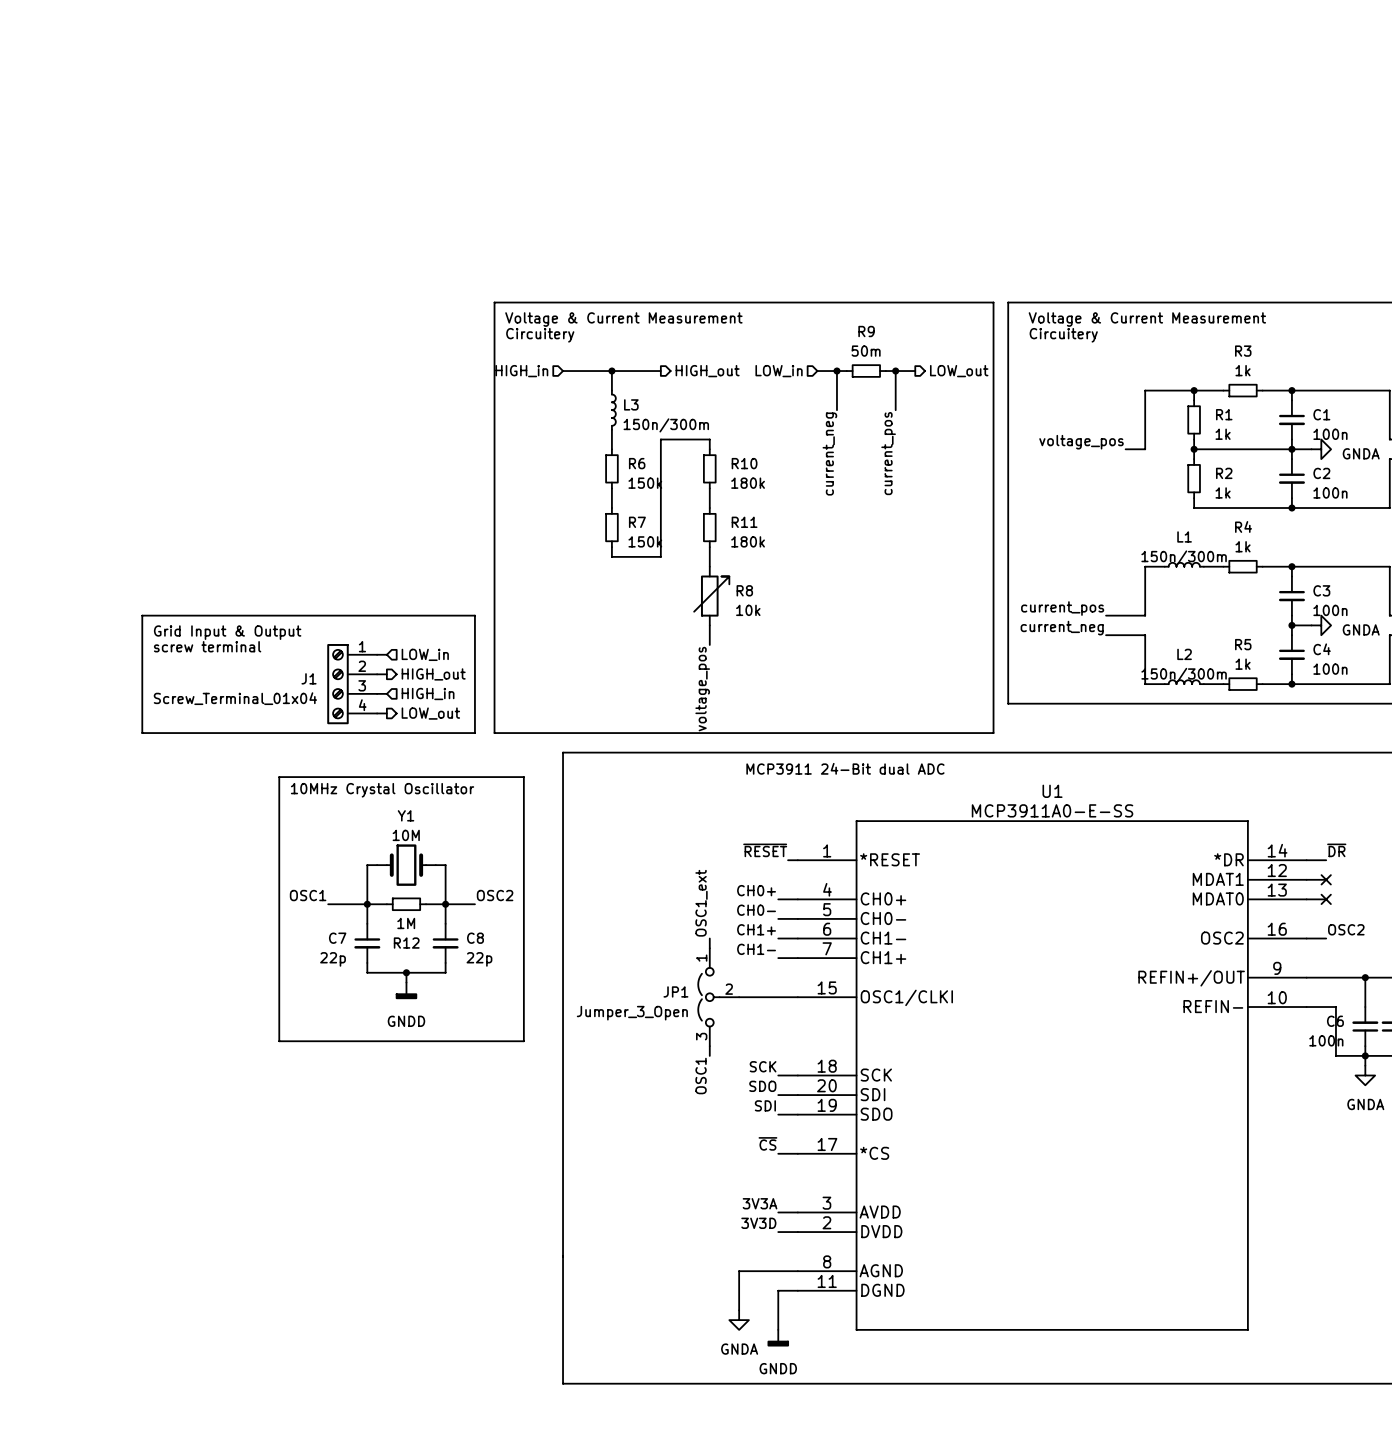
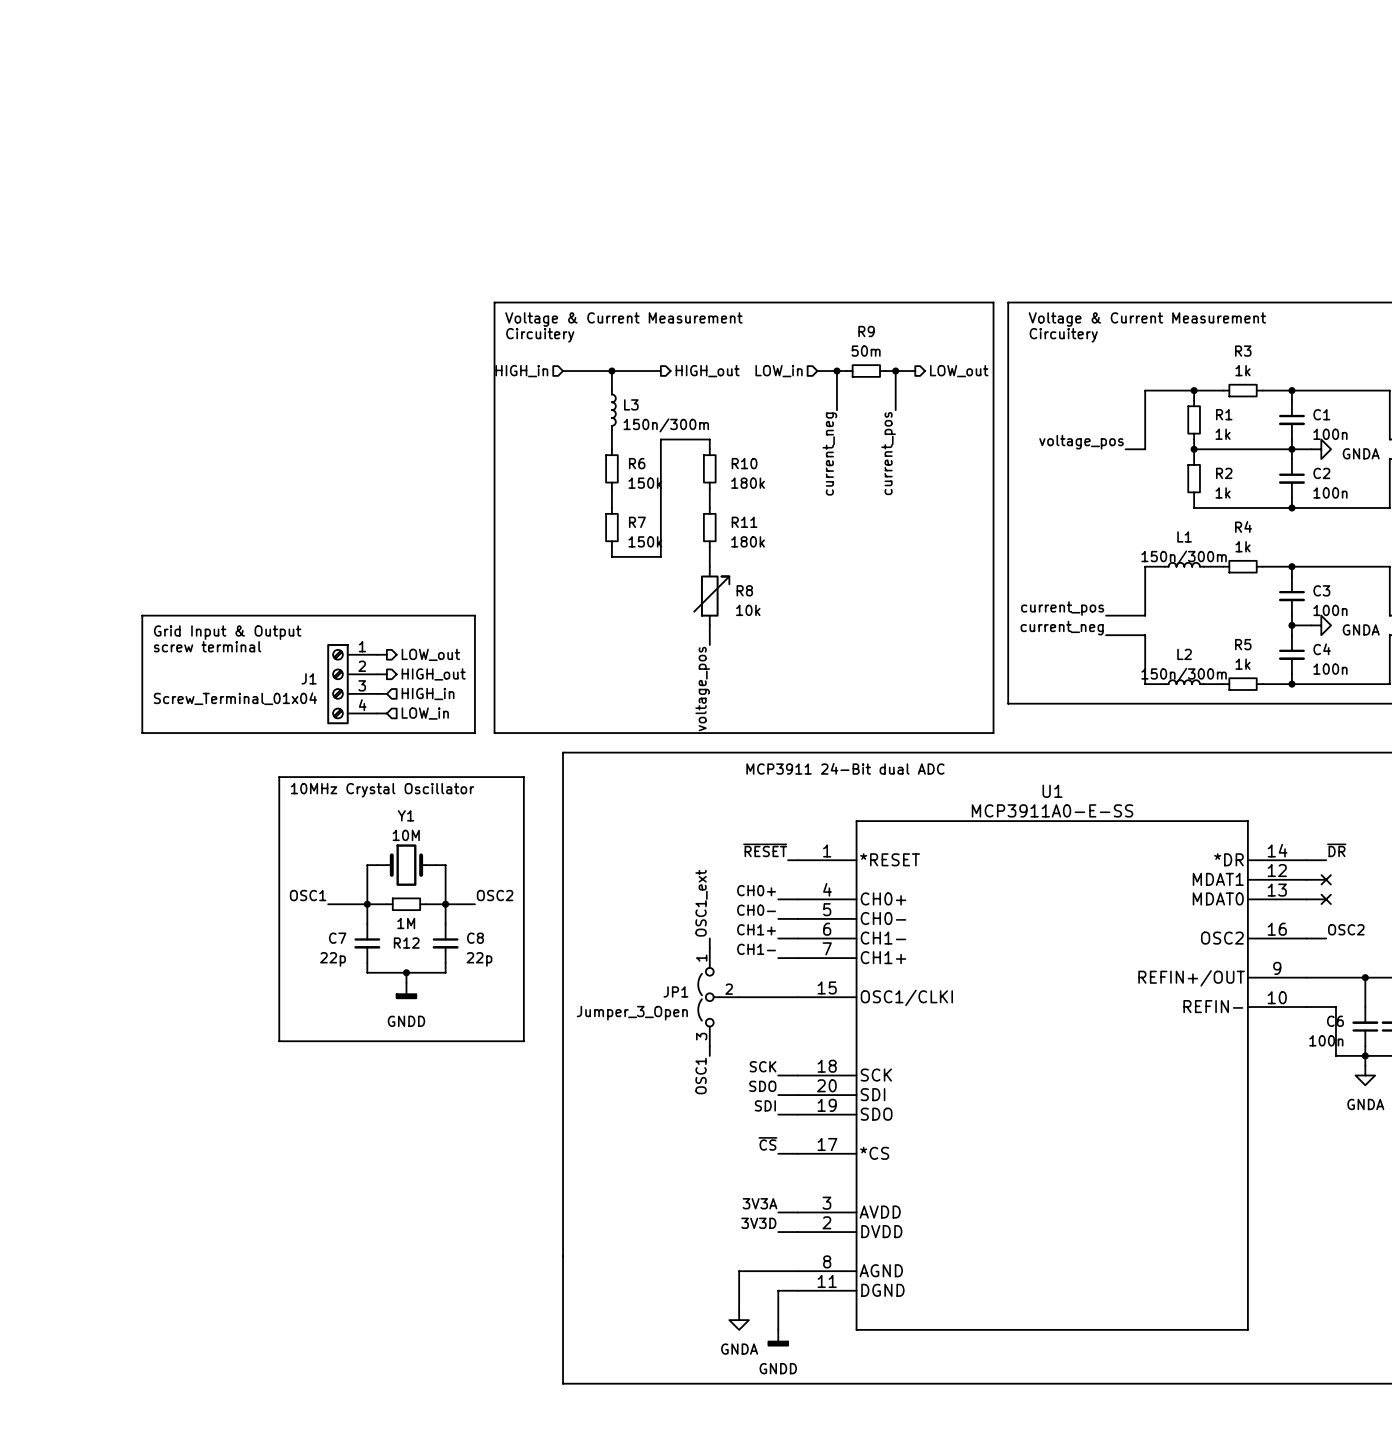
hierarchical label shape: input (425, 654) -> output (430, 654)
hierarchical label: LOW_in (425, 654) -> LOW_out (430, 654)
hierarchical label shape: output (430, 713) -> input (425, 713)
hierarchical label: LOW_out (430, 713) -> LOW_in (425, 713)

